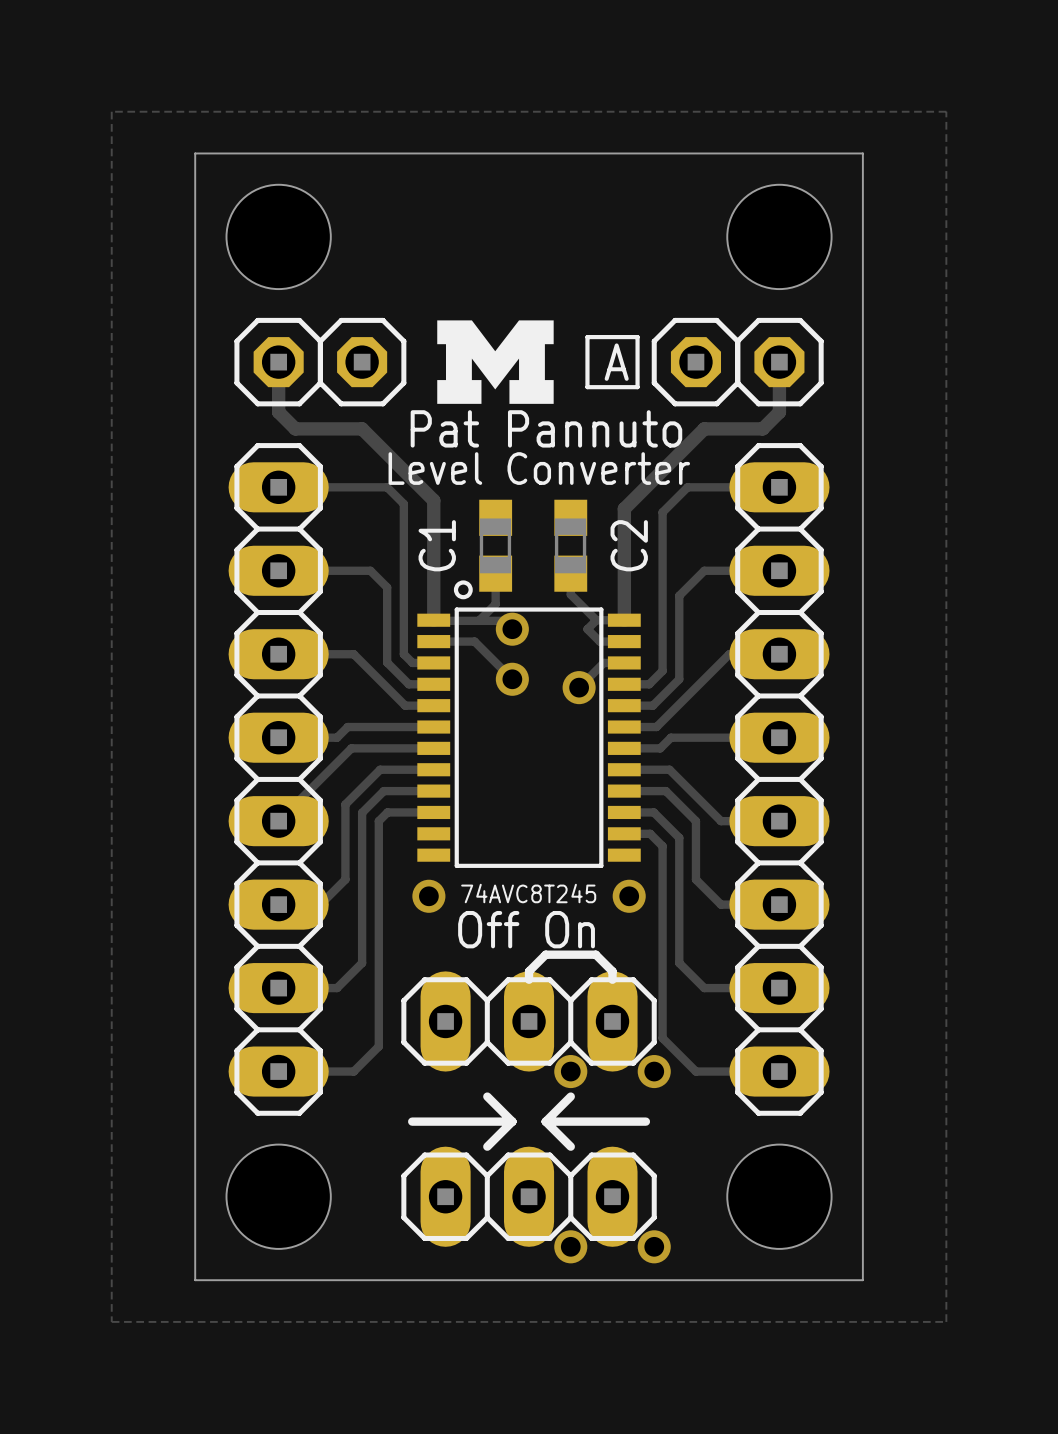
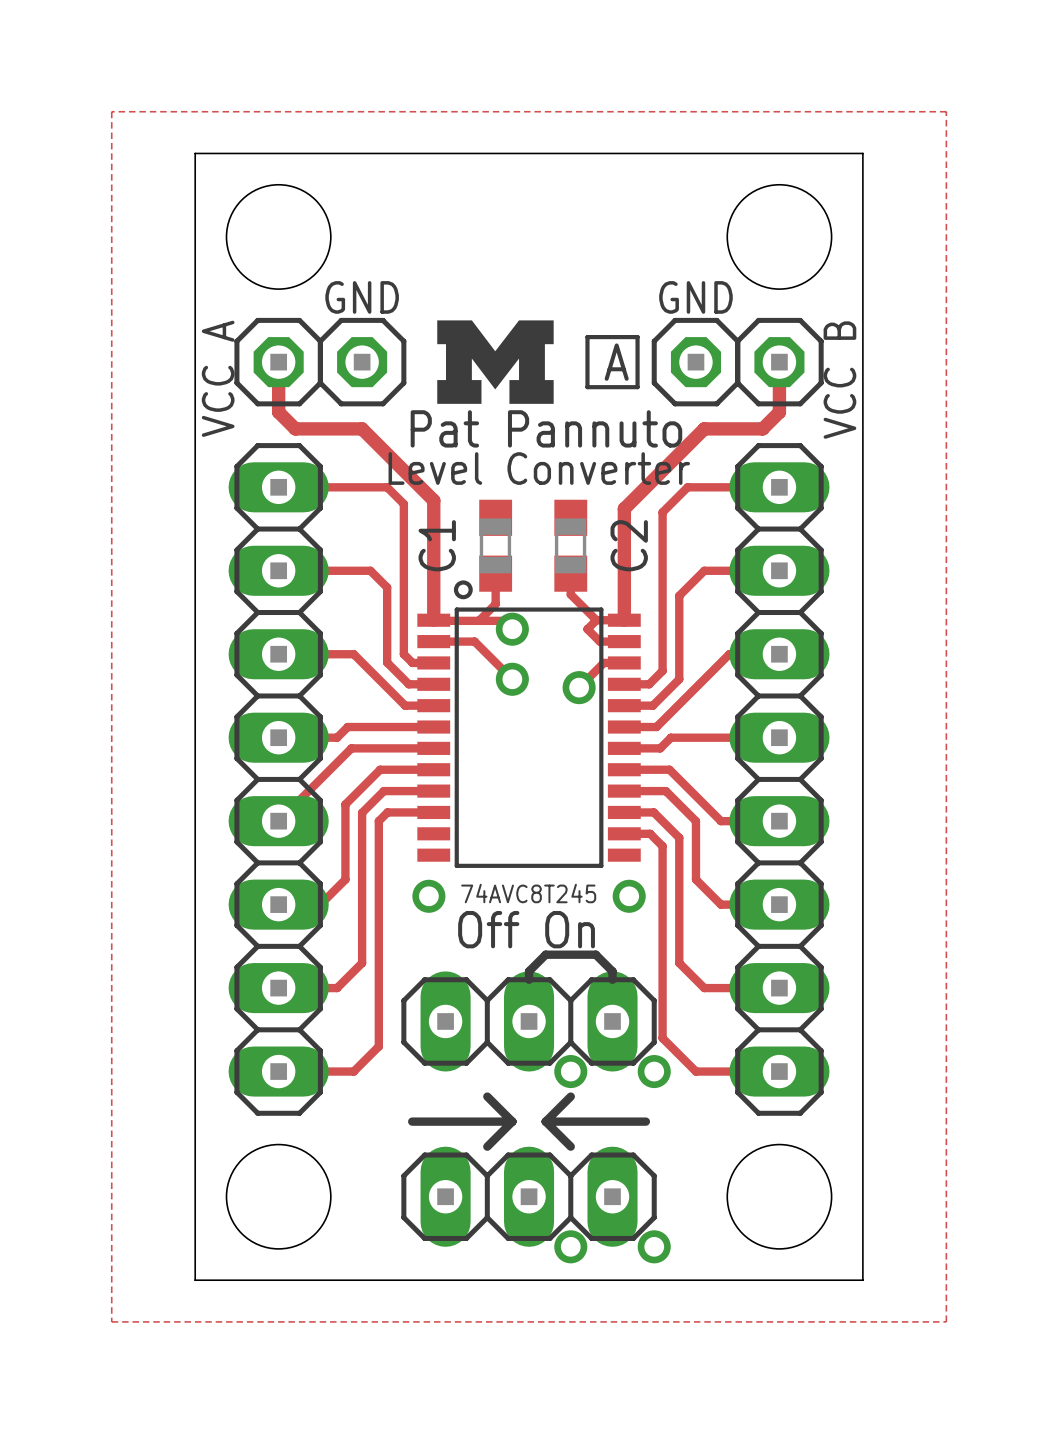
text: none -> GND (362, 297)
text: none -> GND (695, 297)
text: none -> VCC A (218, 378)
text: none -> VCC B (839, 380)

